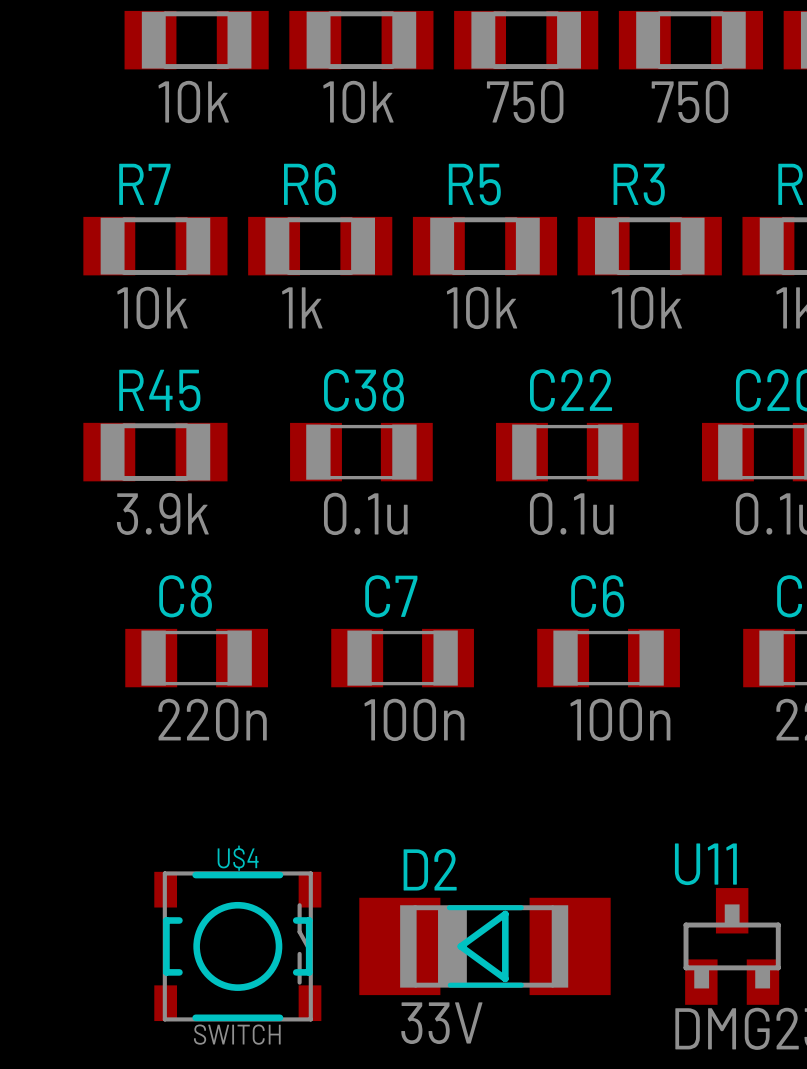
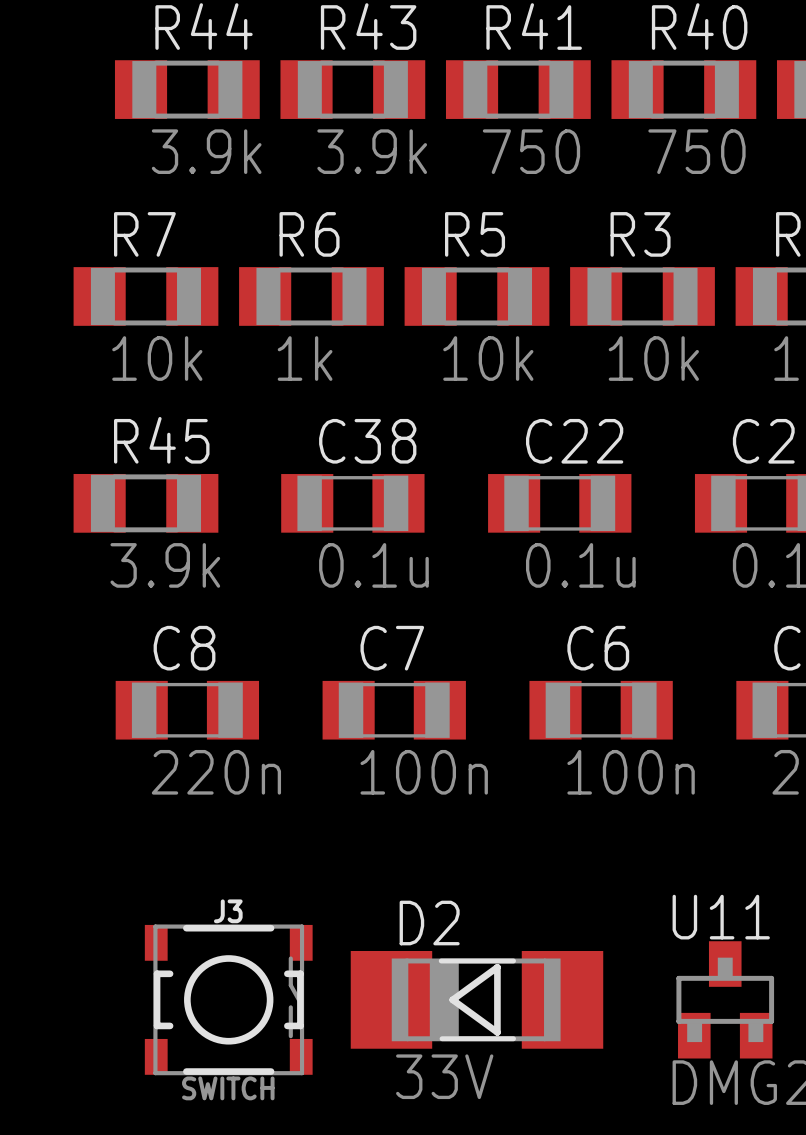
R44 value: 10k (193, 101) -> 3.9k (206, 151)
R43 value: 10k (358, 101) -> 3.9k (372, 151)
U$4 name: U$4 (238, 858) -> J3 (228, 911)

